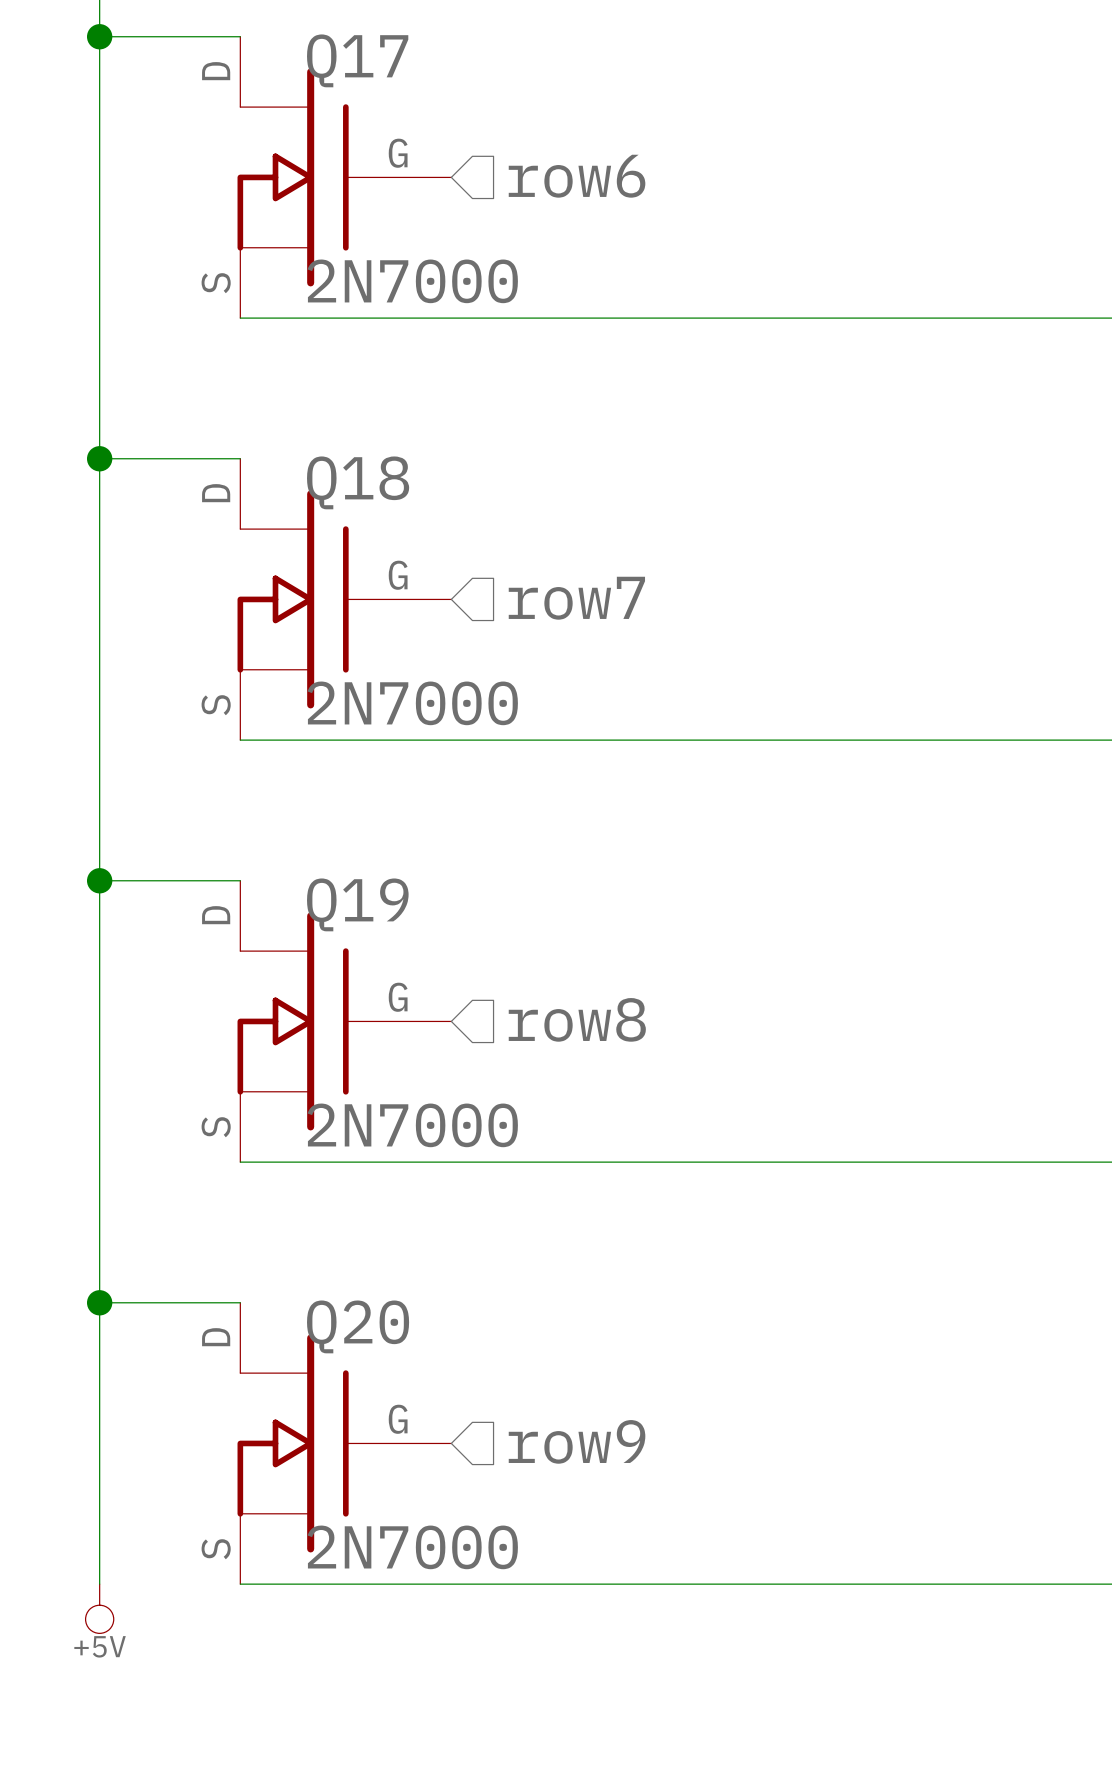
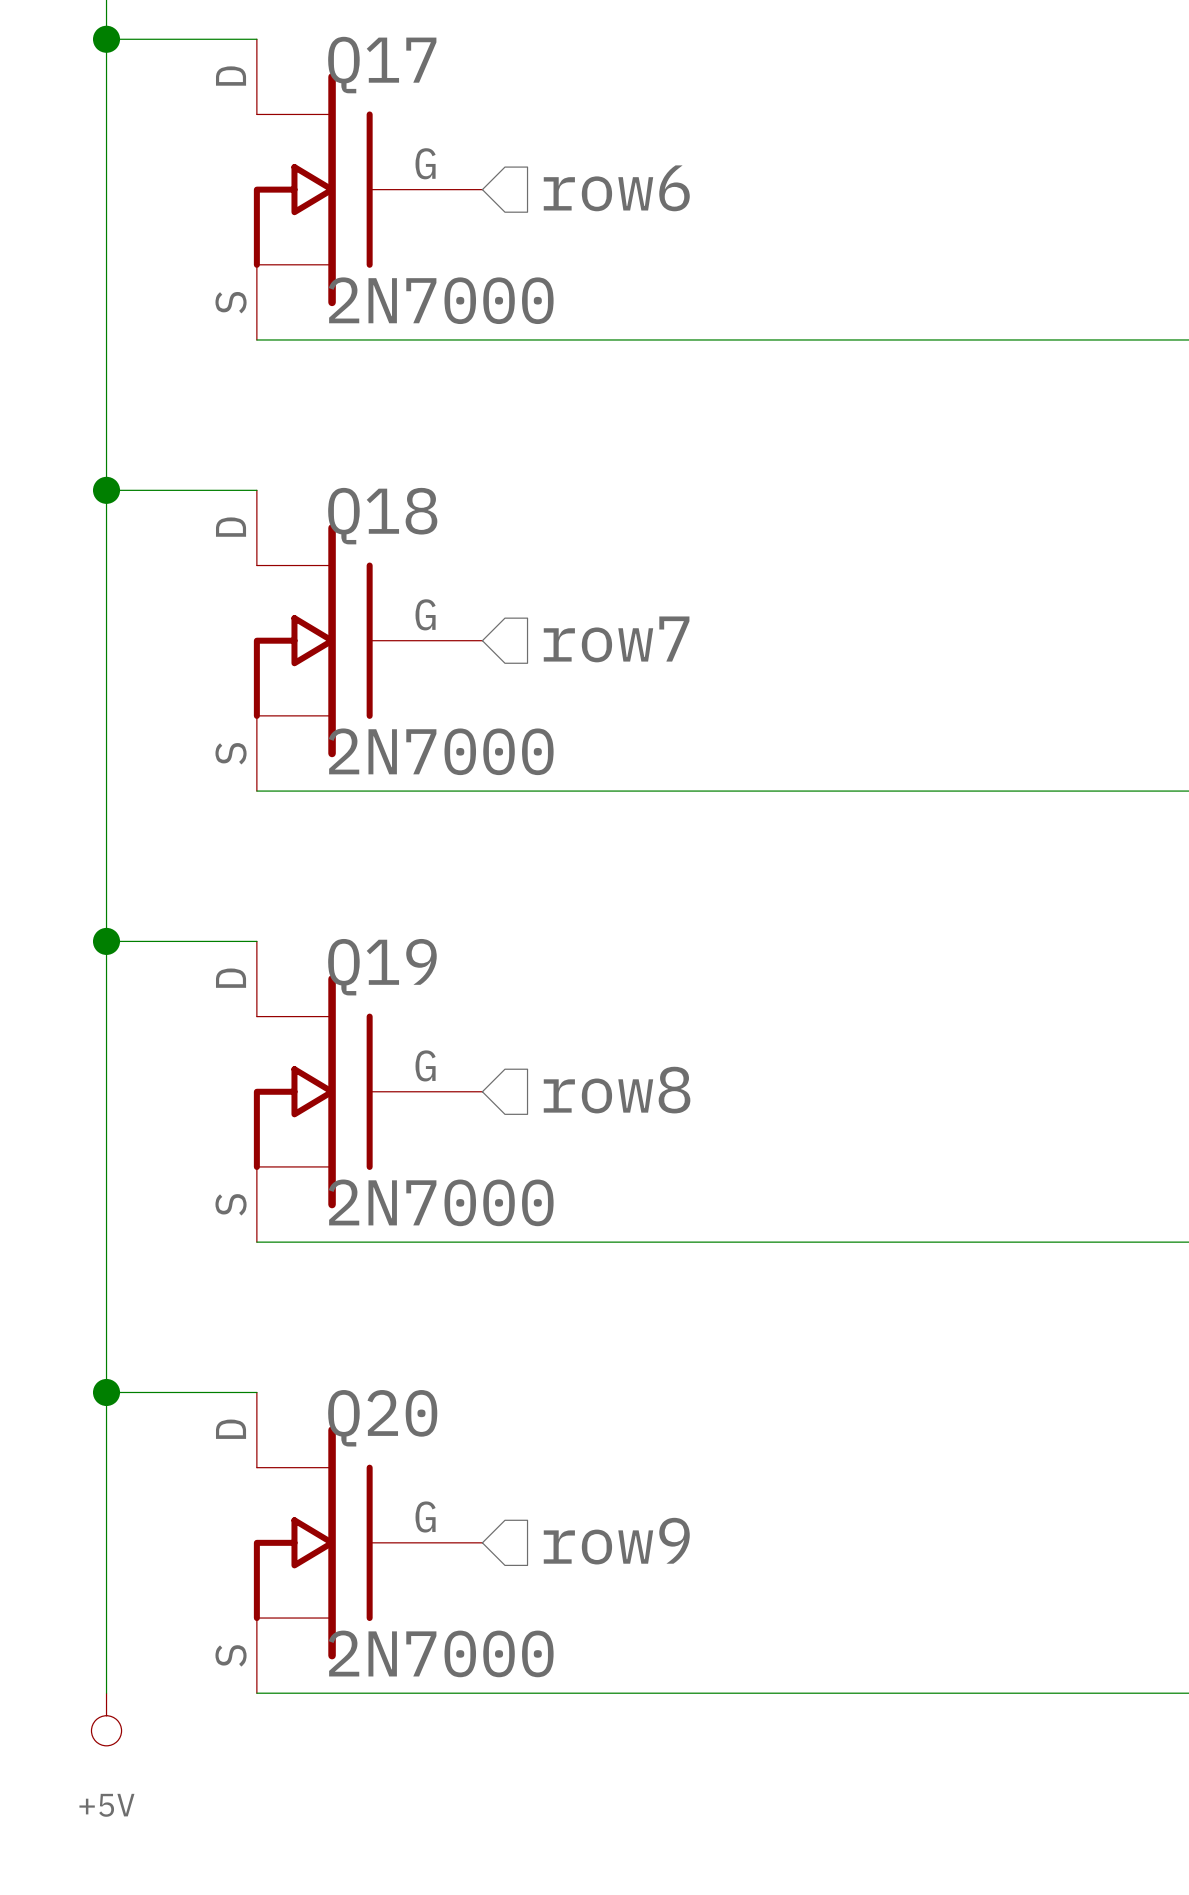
power symbol text position: +5V (100, 1646) -> +5V (106, 1805)

